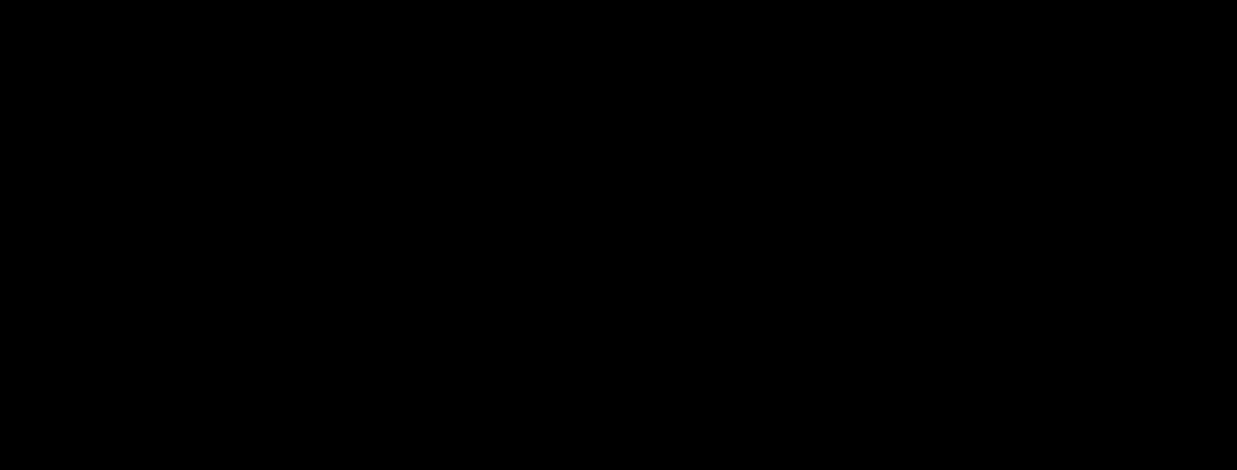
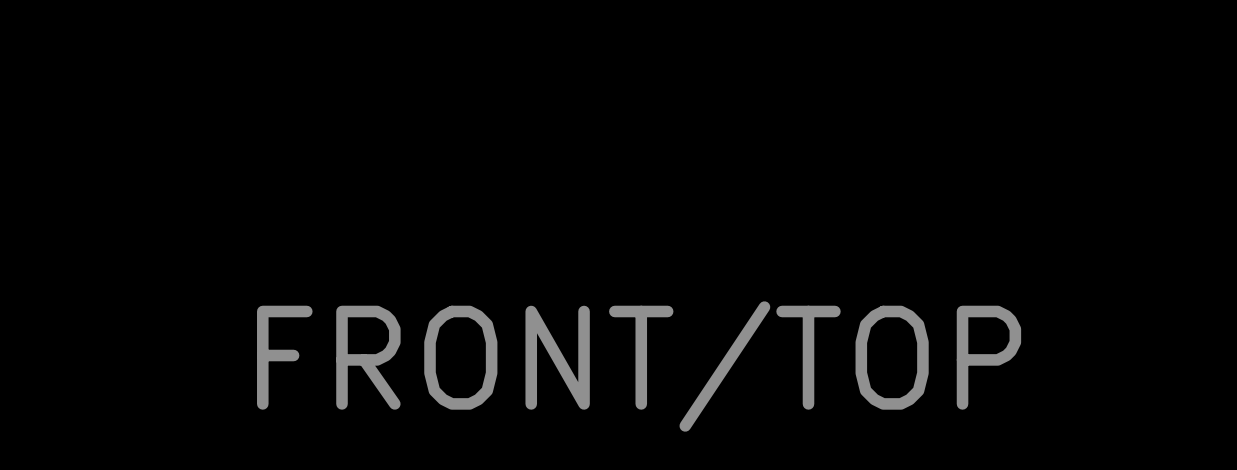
text: none -> FRONT/TOP (639, 366)

